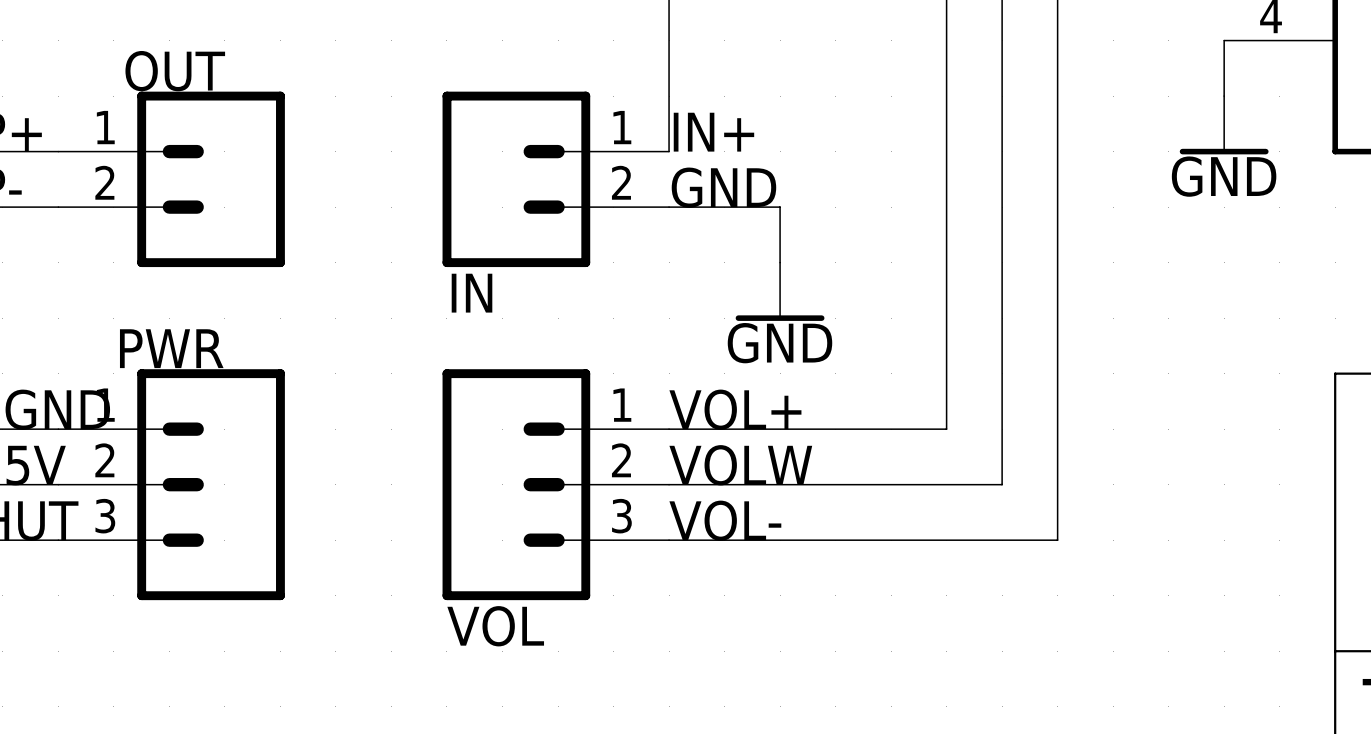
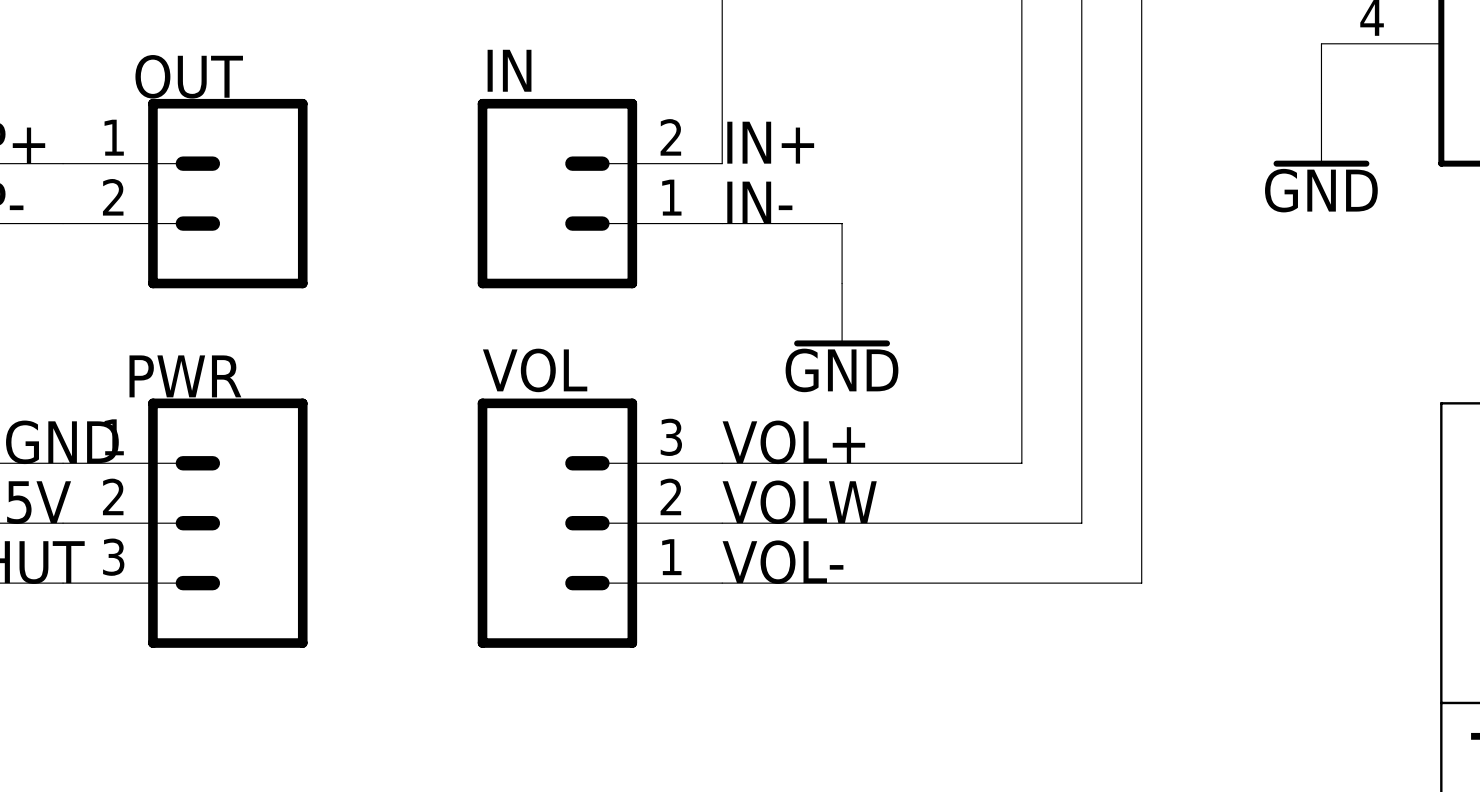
IN flip: as is (516, 179) -> up-down (557, 193)
label: GND (723, 187) -> IN- (759, 202)
VOL flip: as is (516, 484) -> up-down (557, 523)

